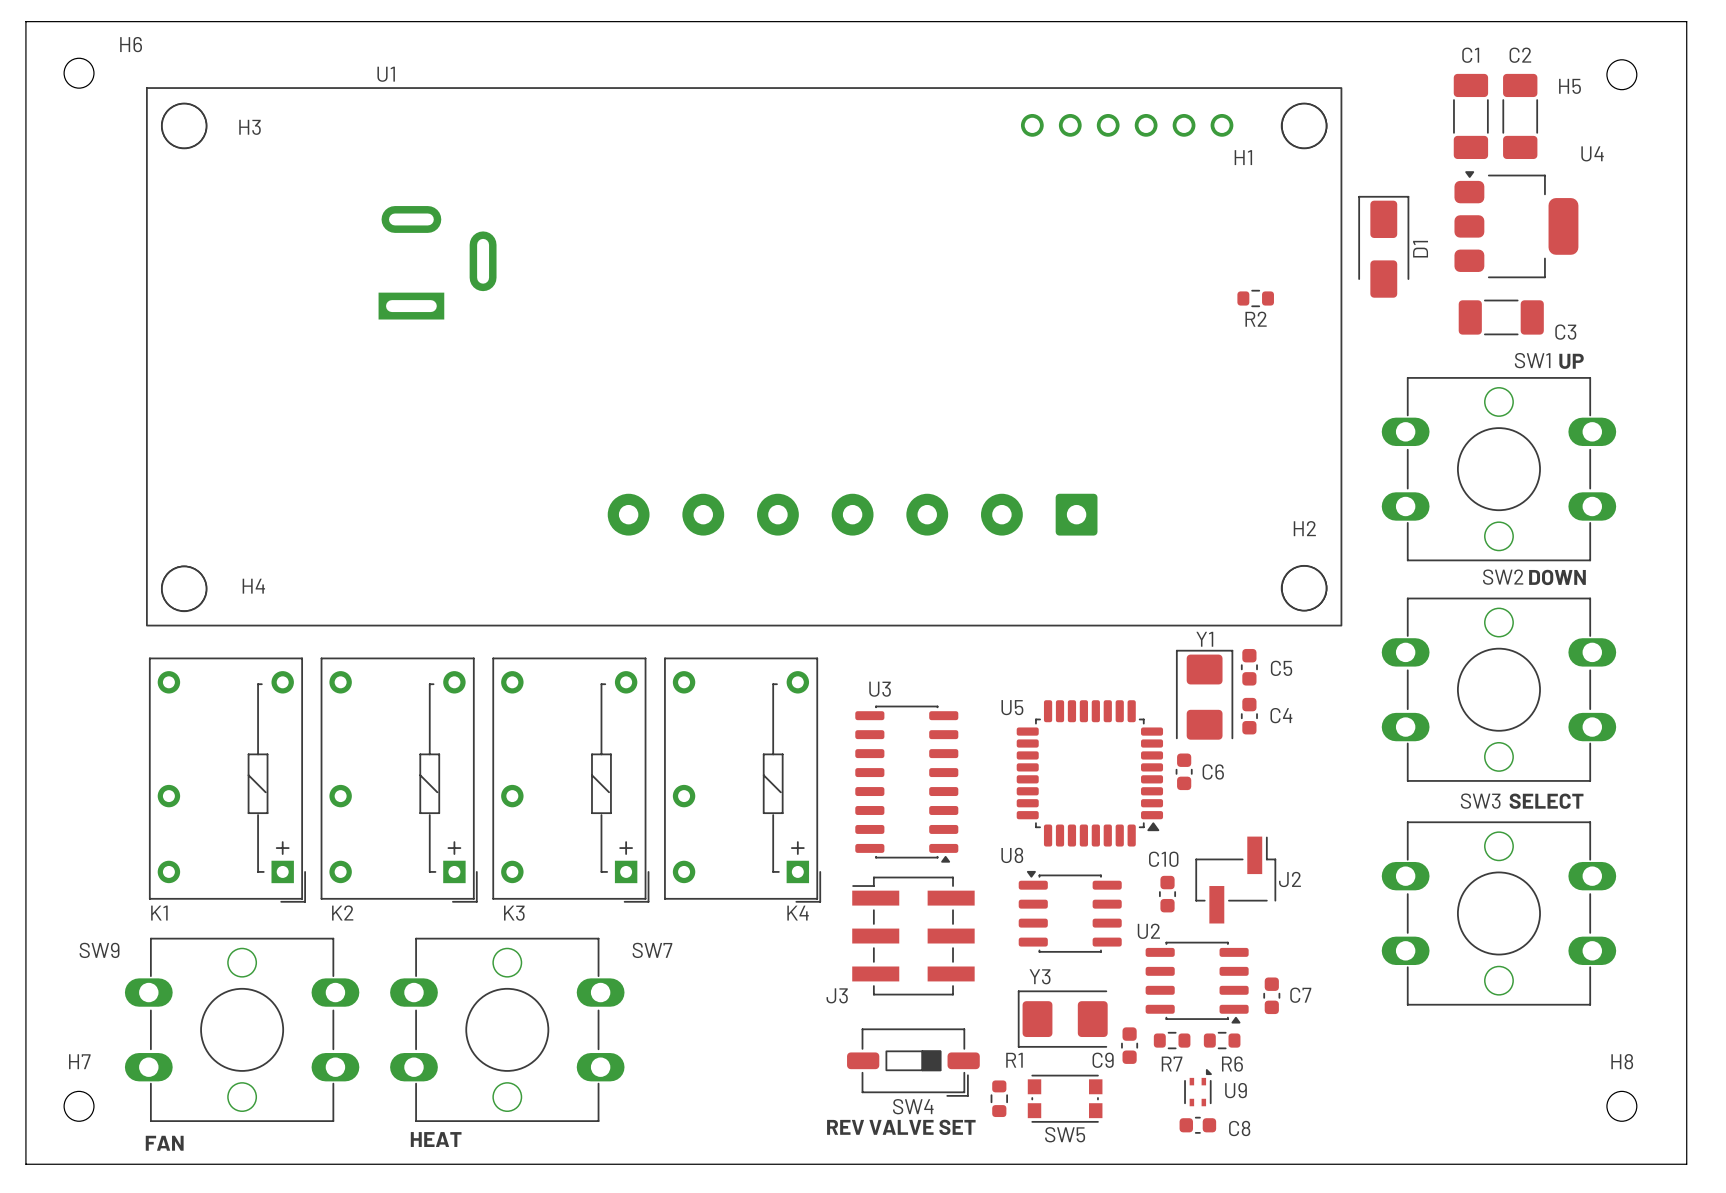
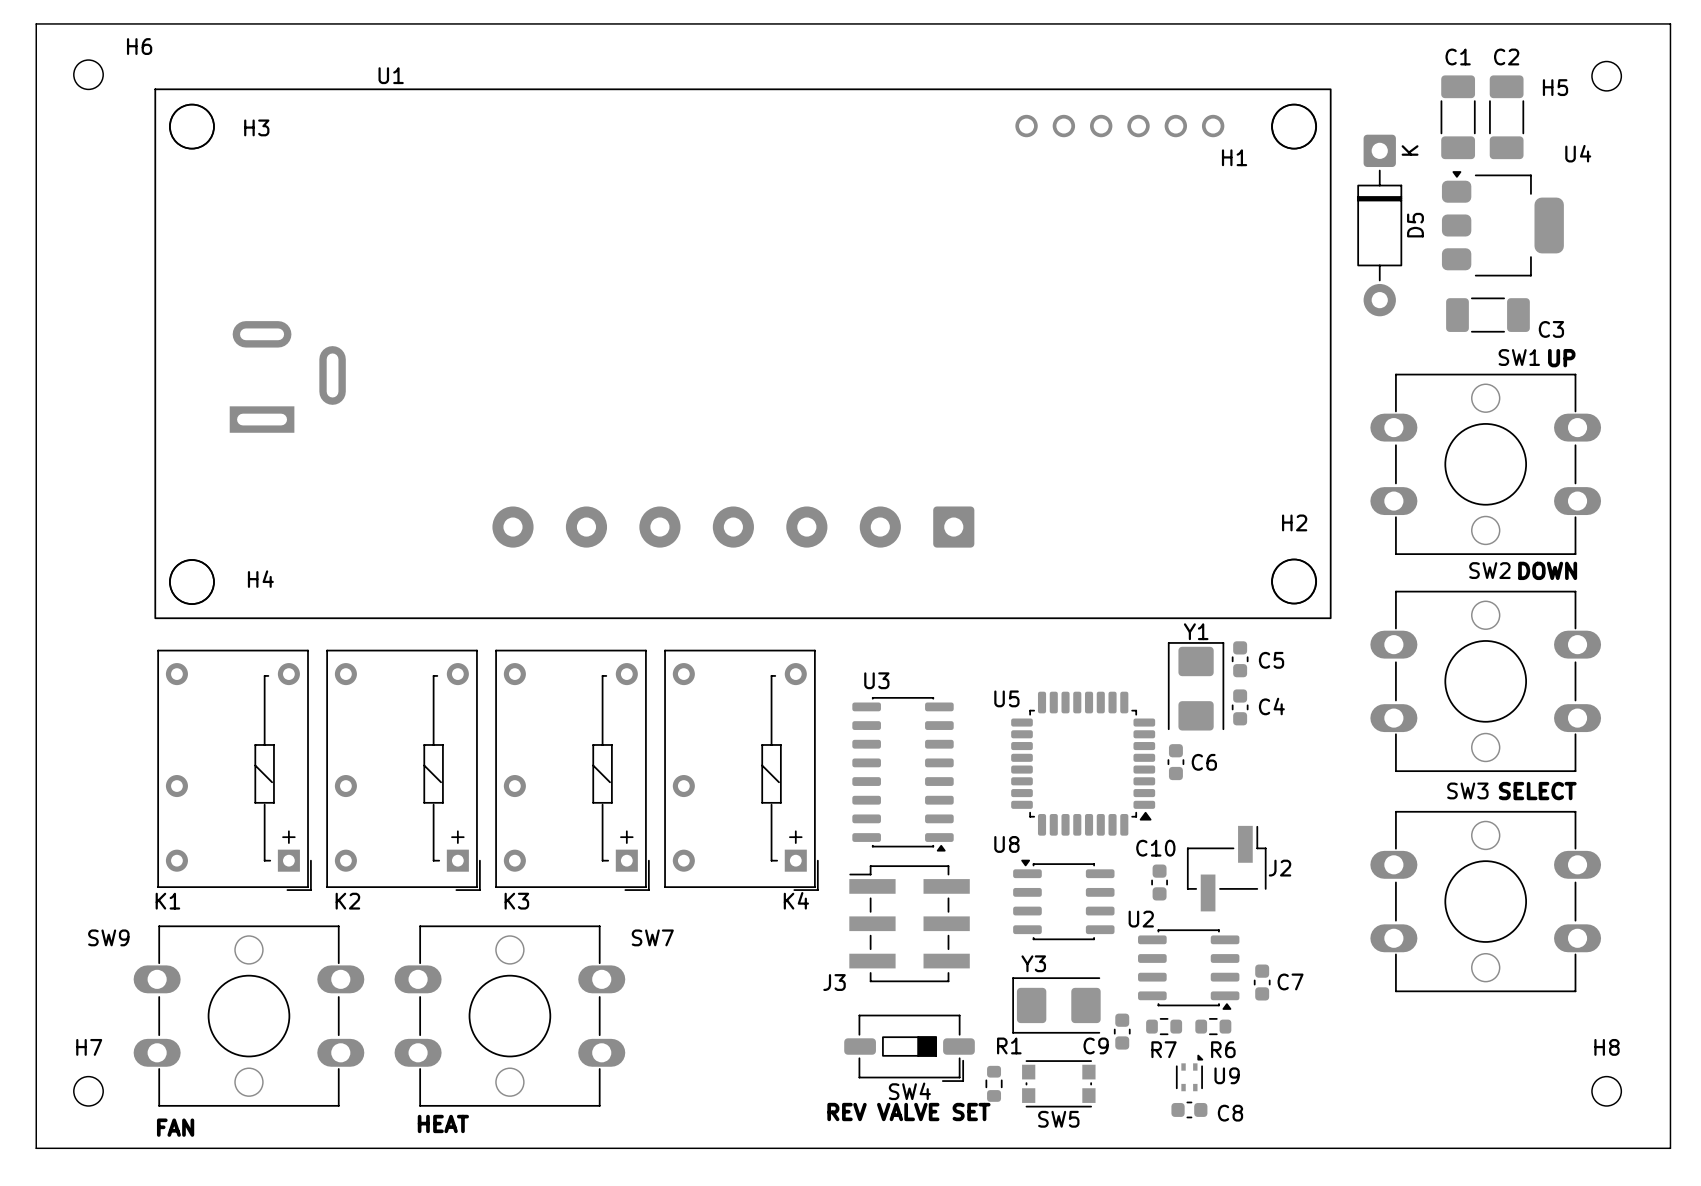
D5: none -> (1379, 225)
D1: (1383, 246) -> none
part position: (437, 262) -> (287, 376)
R2: (1255, 298) -> none
part position: (852, 514) -> (733, 527)

